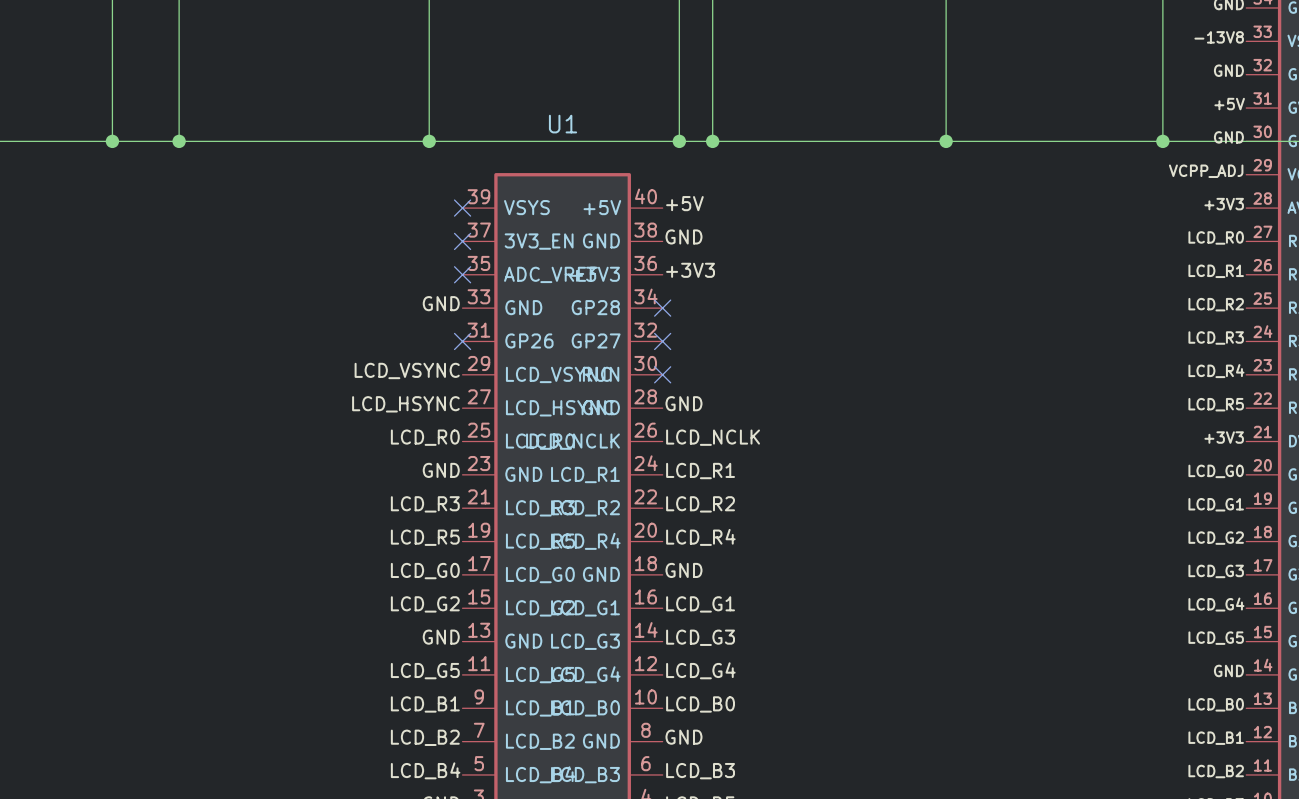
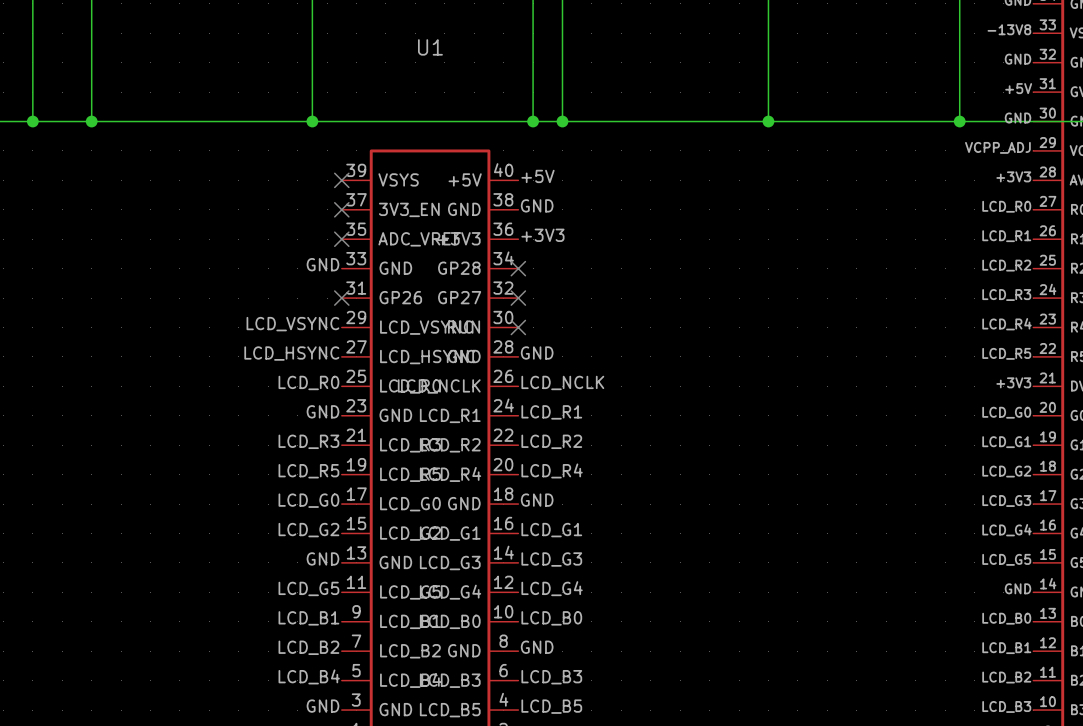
U1 name position: U1 (563, 124) -> U1 (430, 47)

